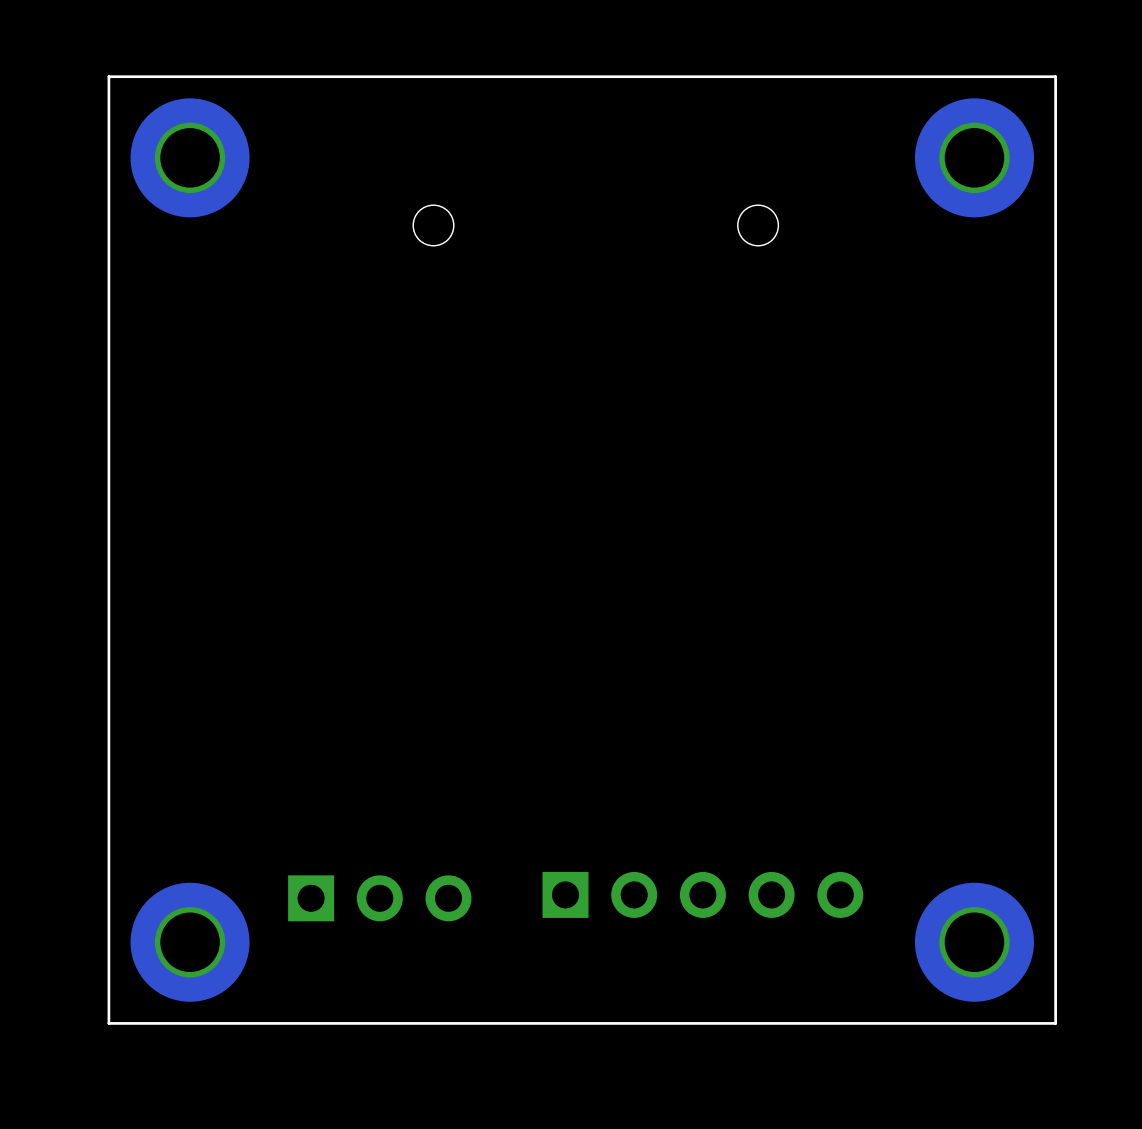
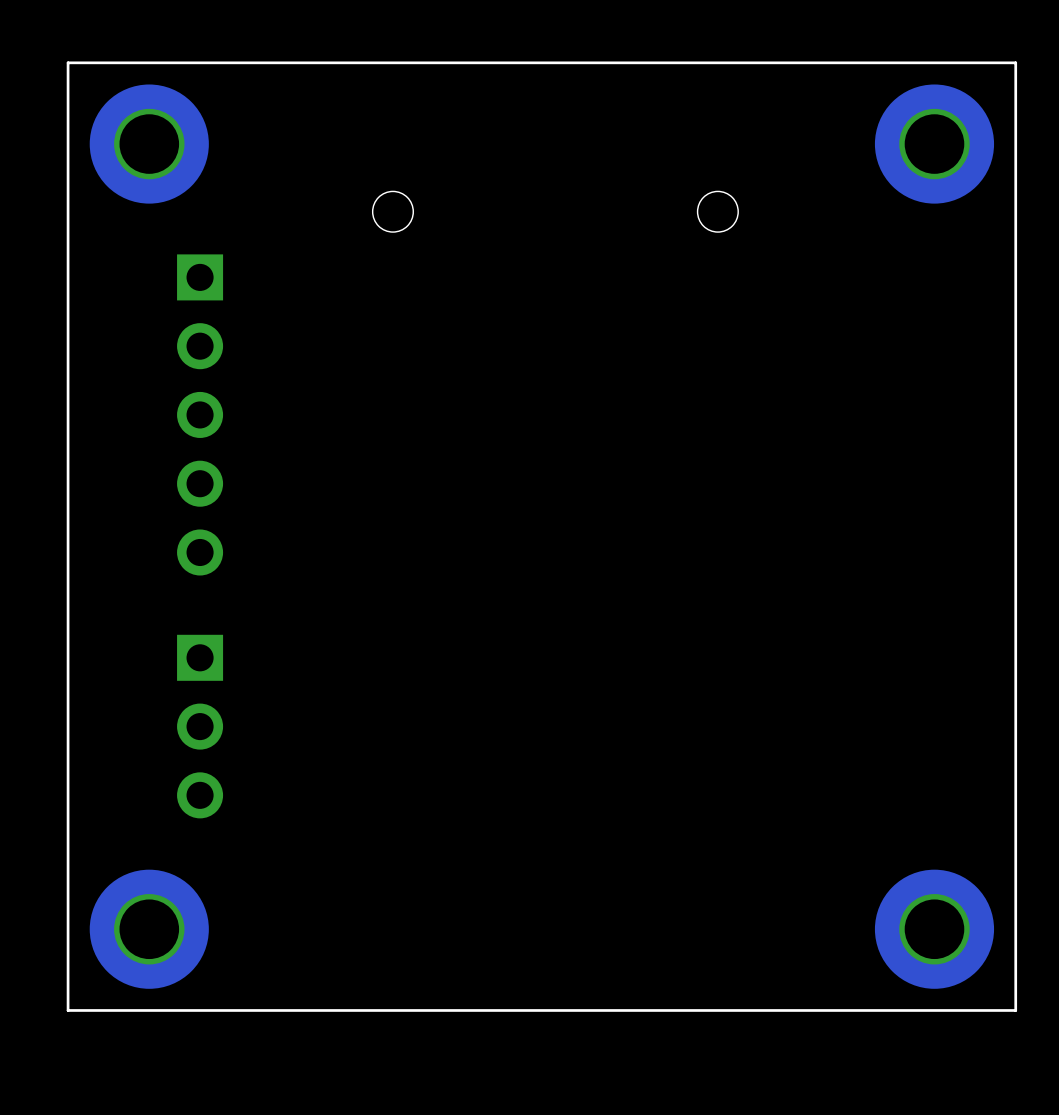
part rotation: 0° (702, 894) -> 90° clockwise (200, 414)
part position: (702, 894) -> (200, 414)
part rotation: 0° (379, 898) -> 90° clockwise (200, 726)
part position: (379, 898) -> (200, 726)

